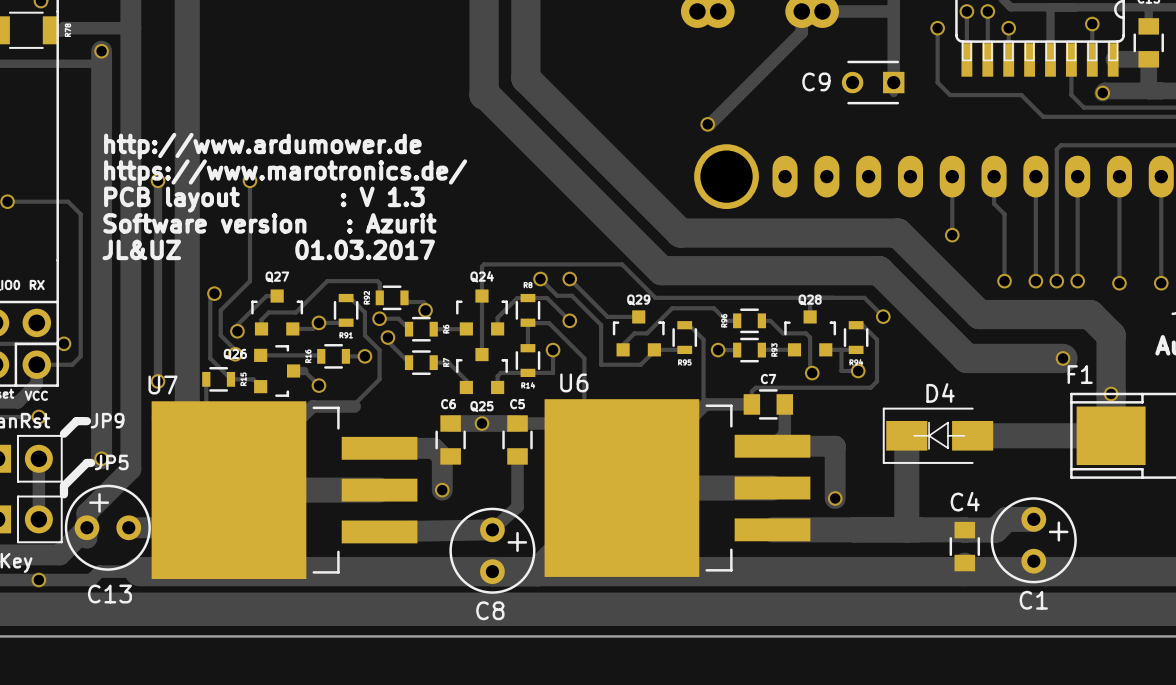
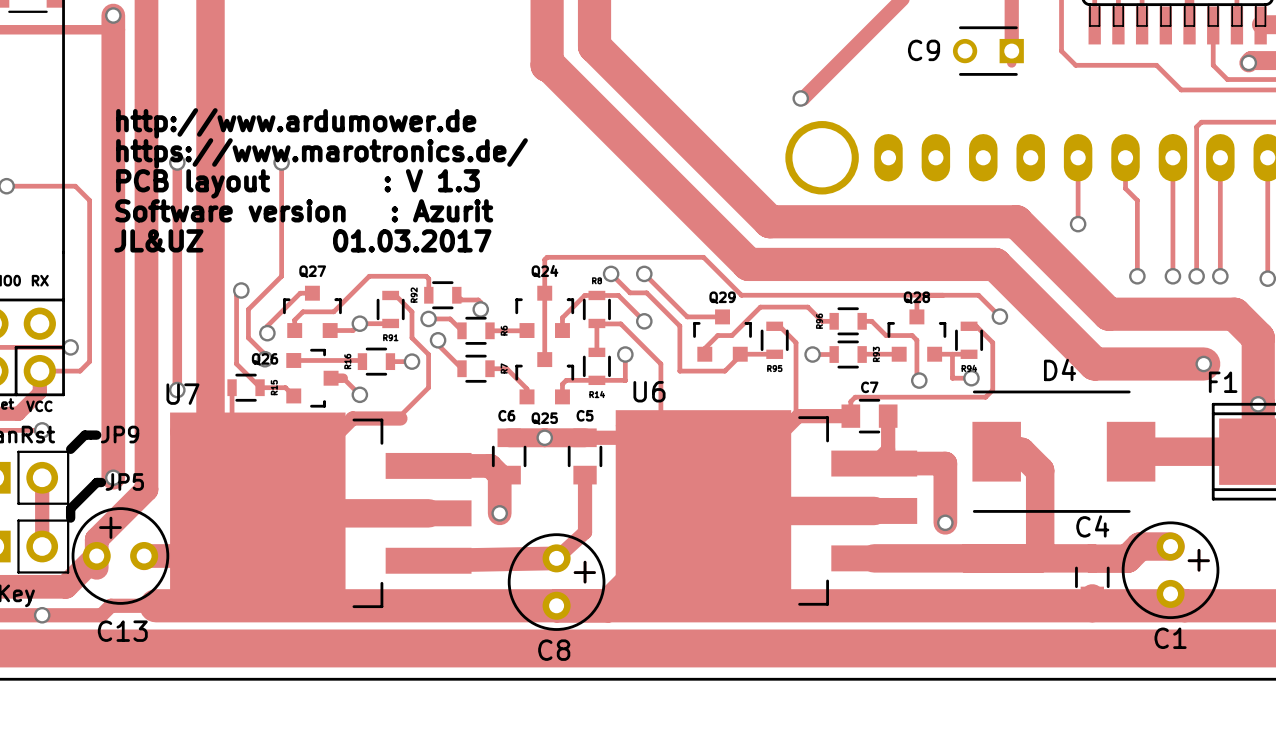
D4 footprint: [882, 407, 994, 464] -> [972, 390, 1156, 513]
track: none -> (996, 451) (1021, 451) (1040, 470) (1040, 558)
track: (906, 435) (906, 529) -> none

